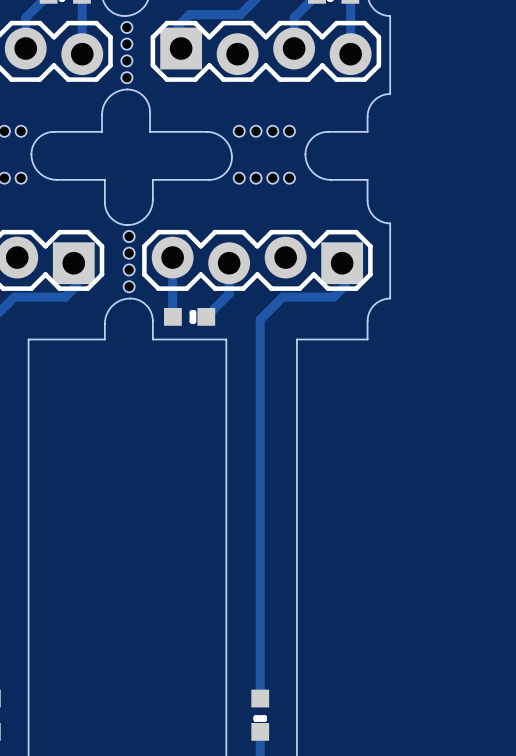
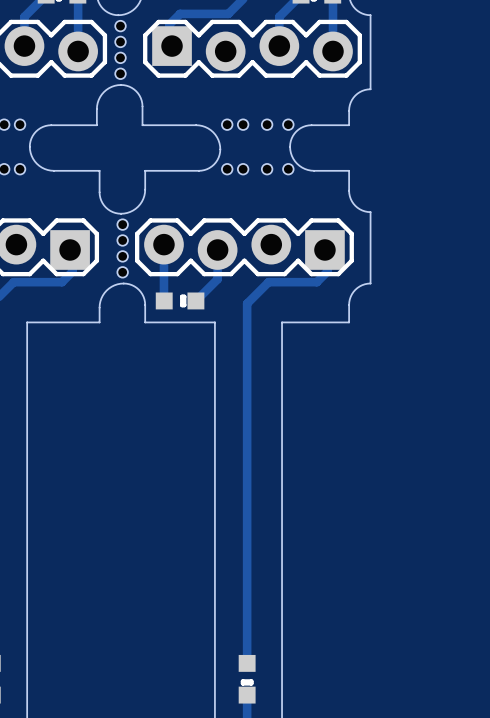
hole: (272, 131) -> none
hole: none -> (267, 124)
hole: (289, 131) -> none
hole: none -> (288, 124)
hole: (272, 178) -> none
hole: none -> (267, 169)
hole: (289, 178) -> none
hole: none -> (288, 169)

